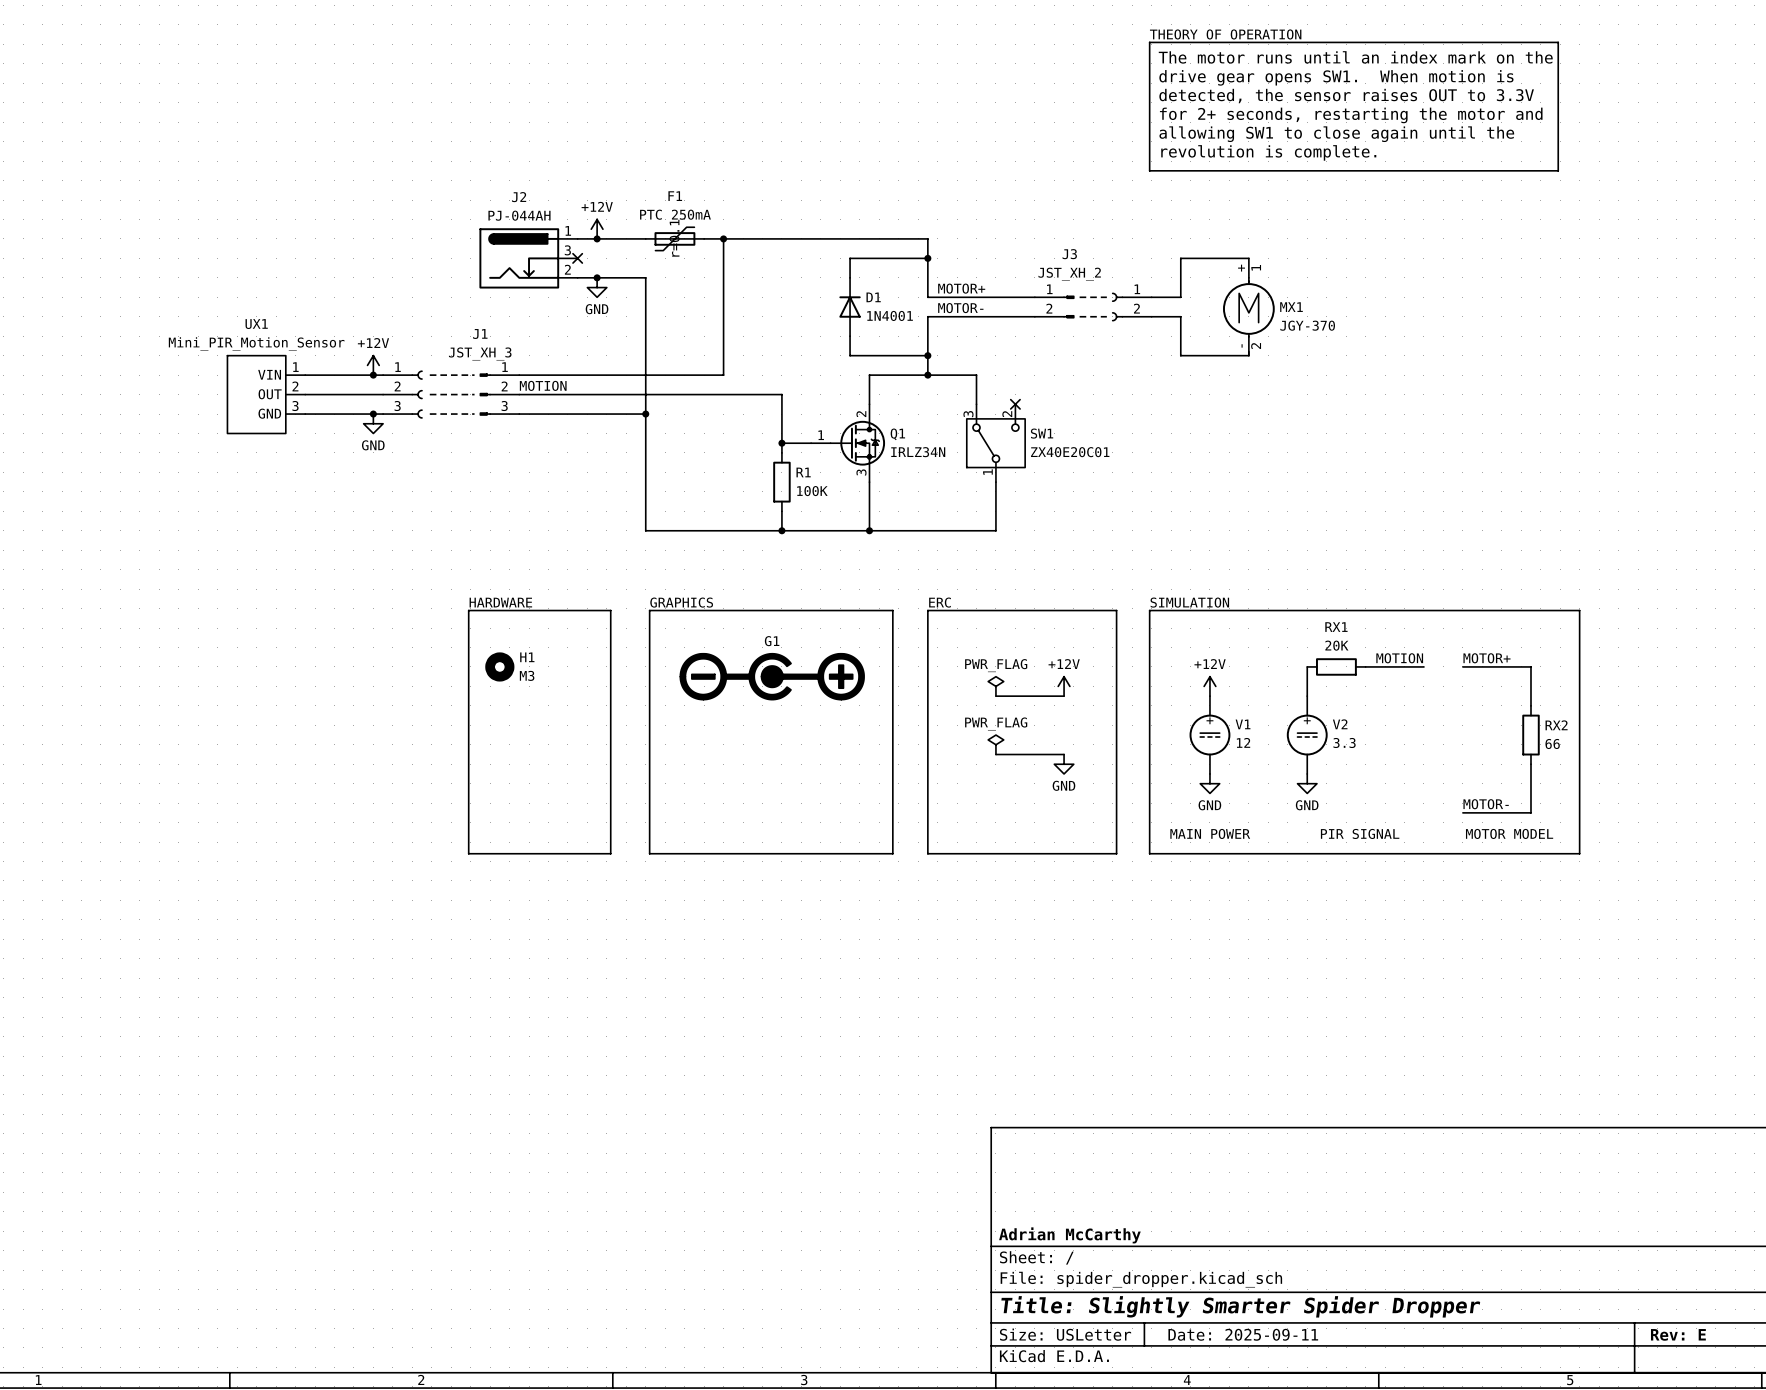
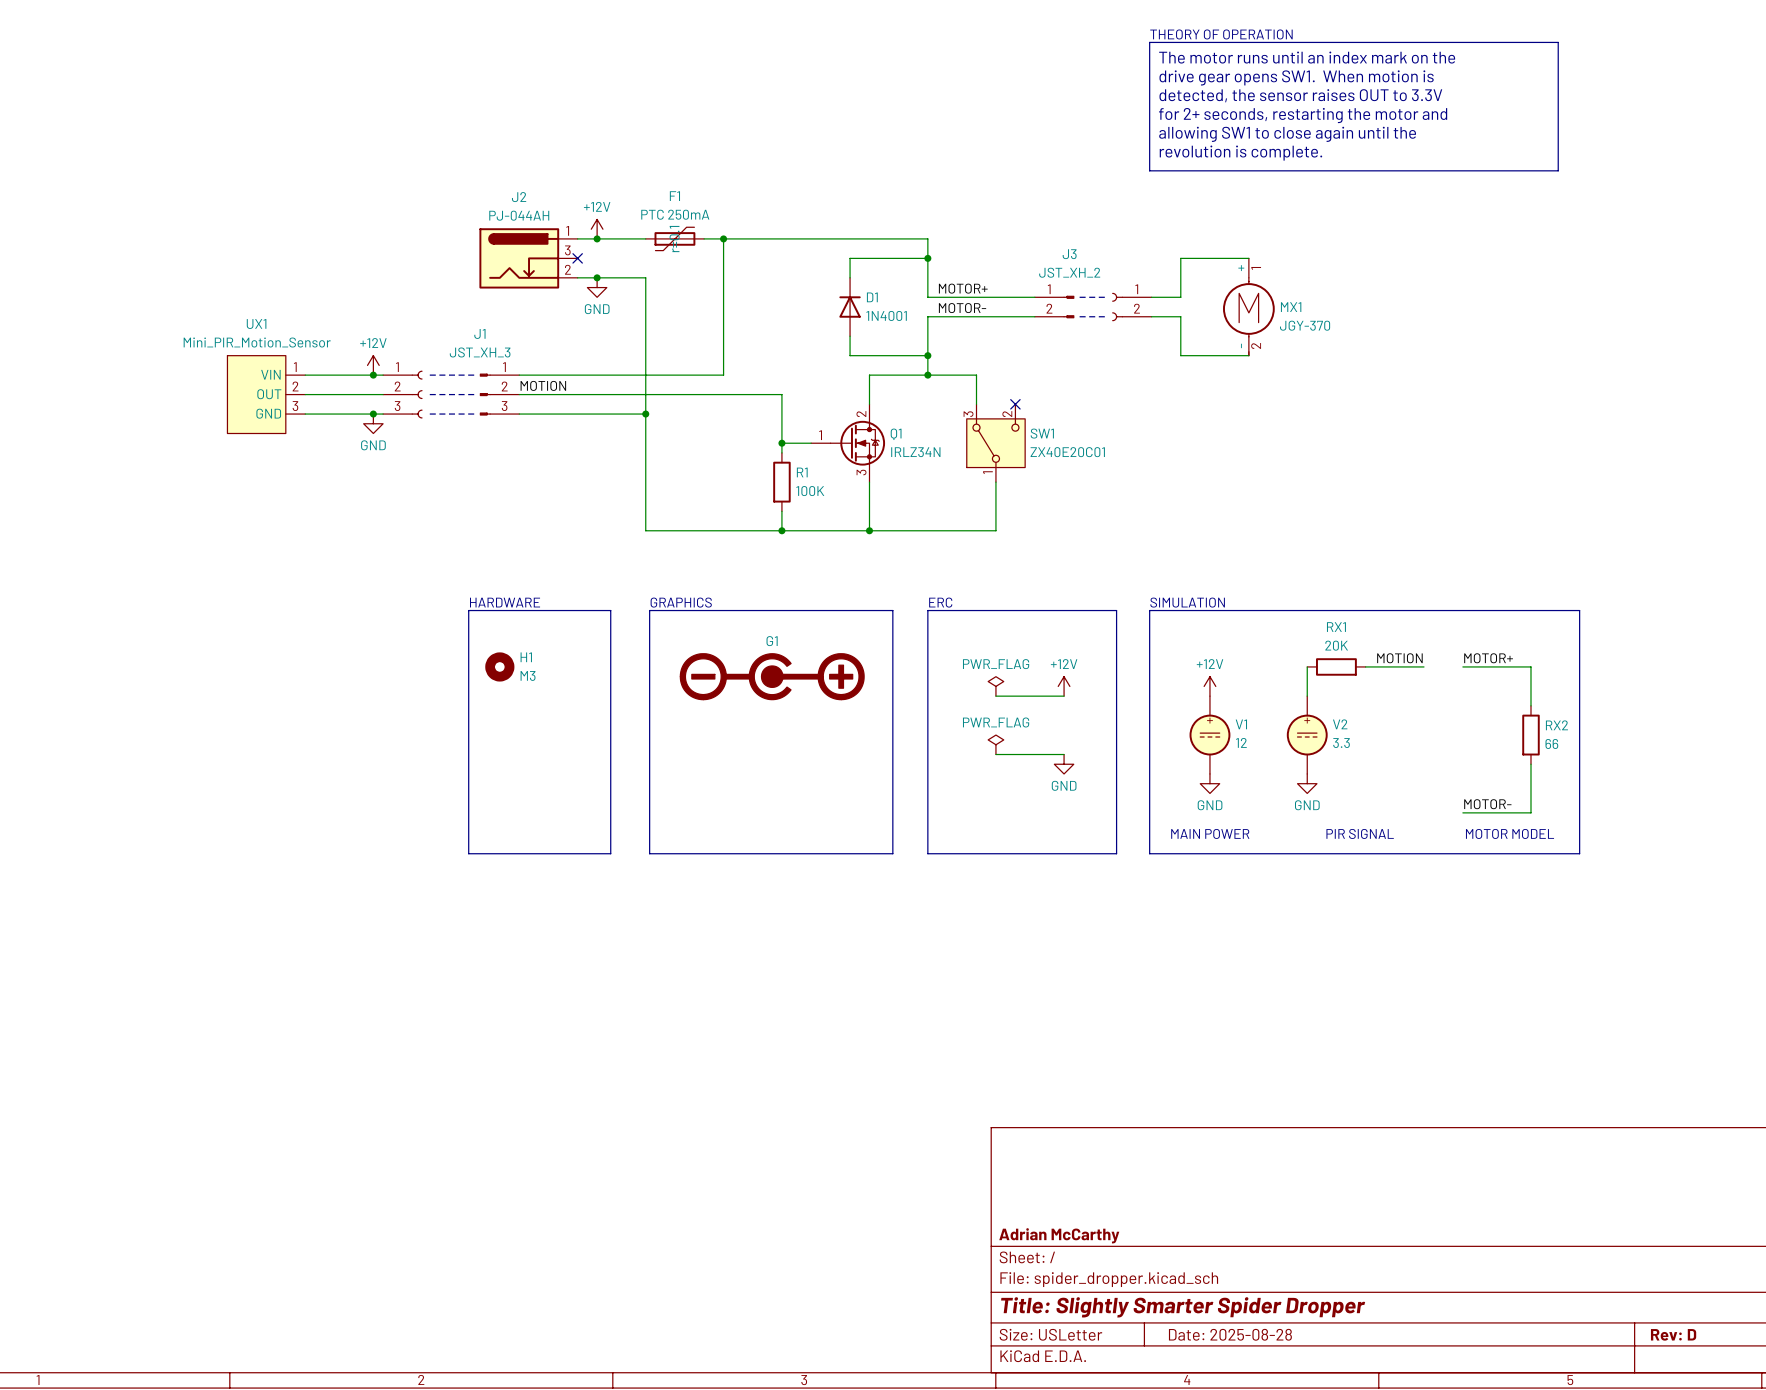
title block: Date: 2025-09-11 (1243, 1334) -> Date: 2025-08-28 (1230, 1334)
title block: Rev: E (1678, 1334) -> Rev: D (1673, 1334)

